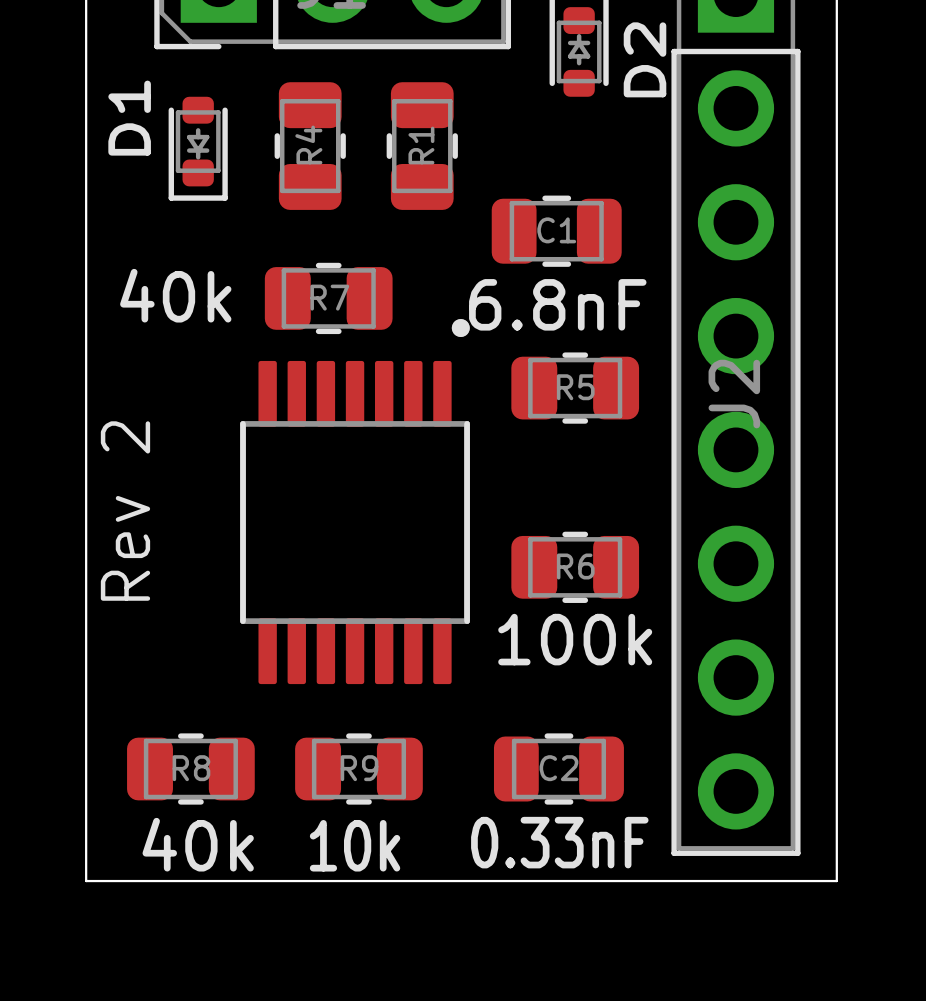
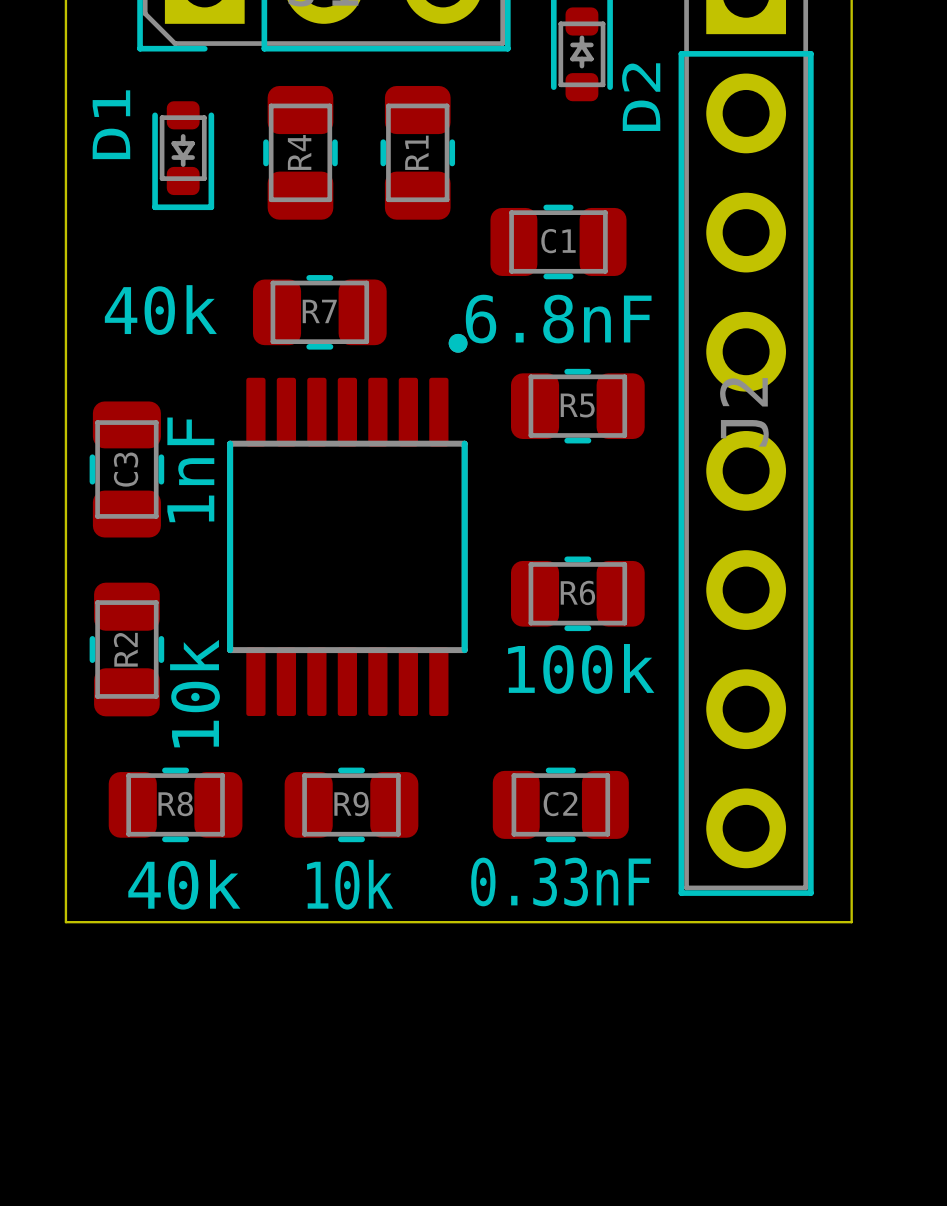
D2 name position: D2 (645, 59) -> D2 (641, 97)
C3: none -> 1nF (126, 469)
text: Rev 2 (125, 511) -> none
R2: none -> 10k (126, 649)

